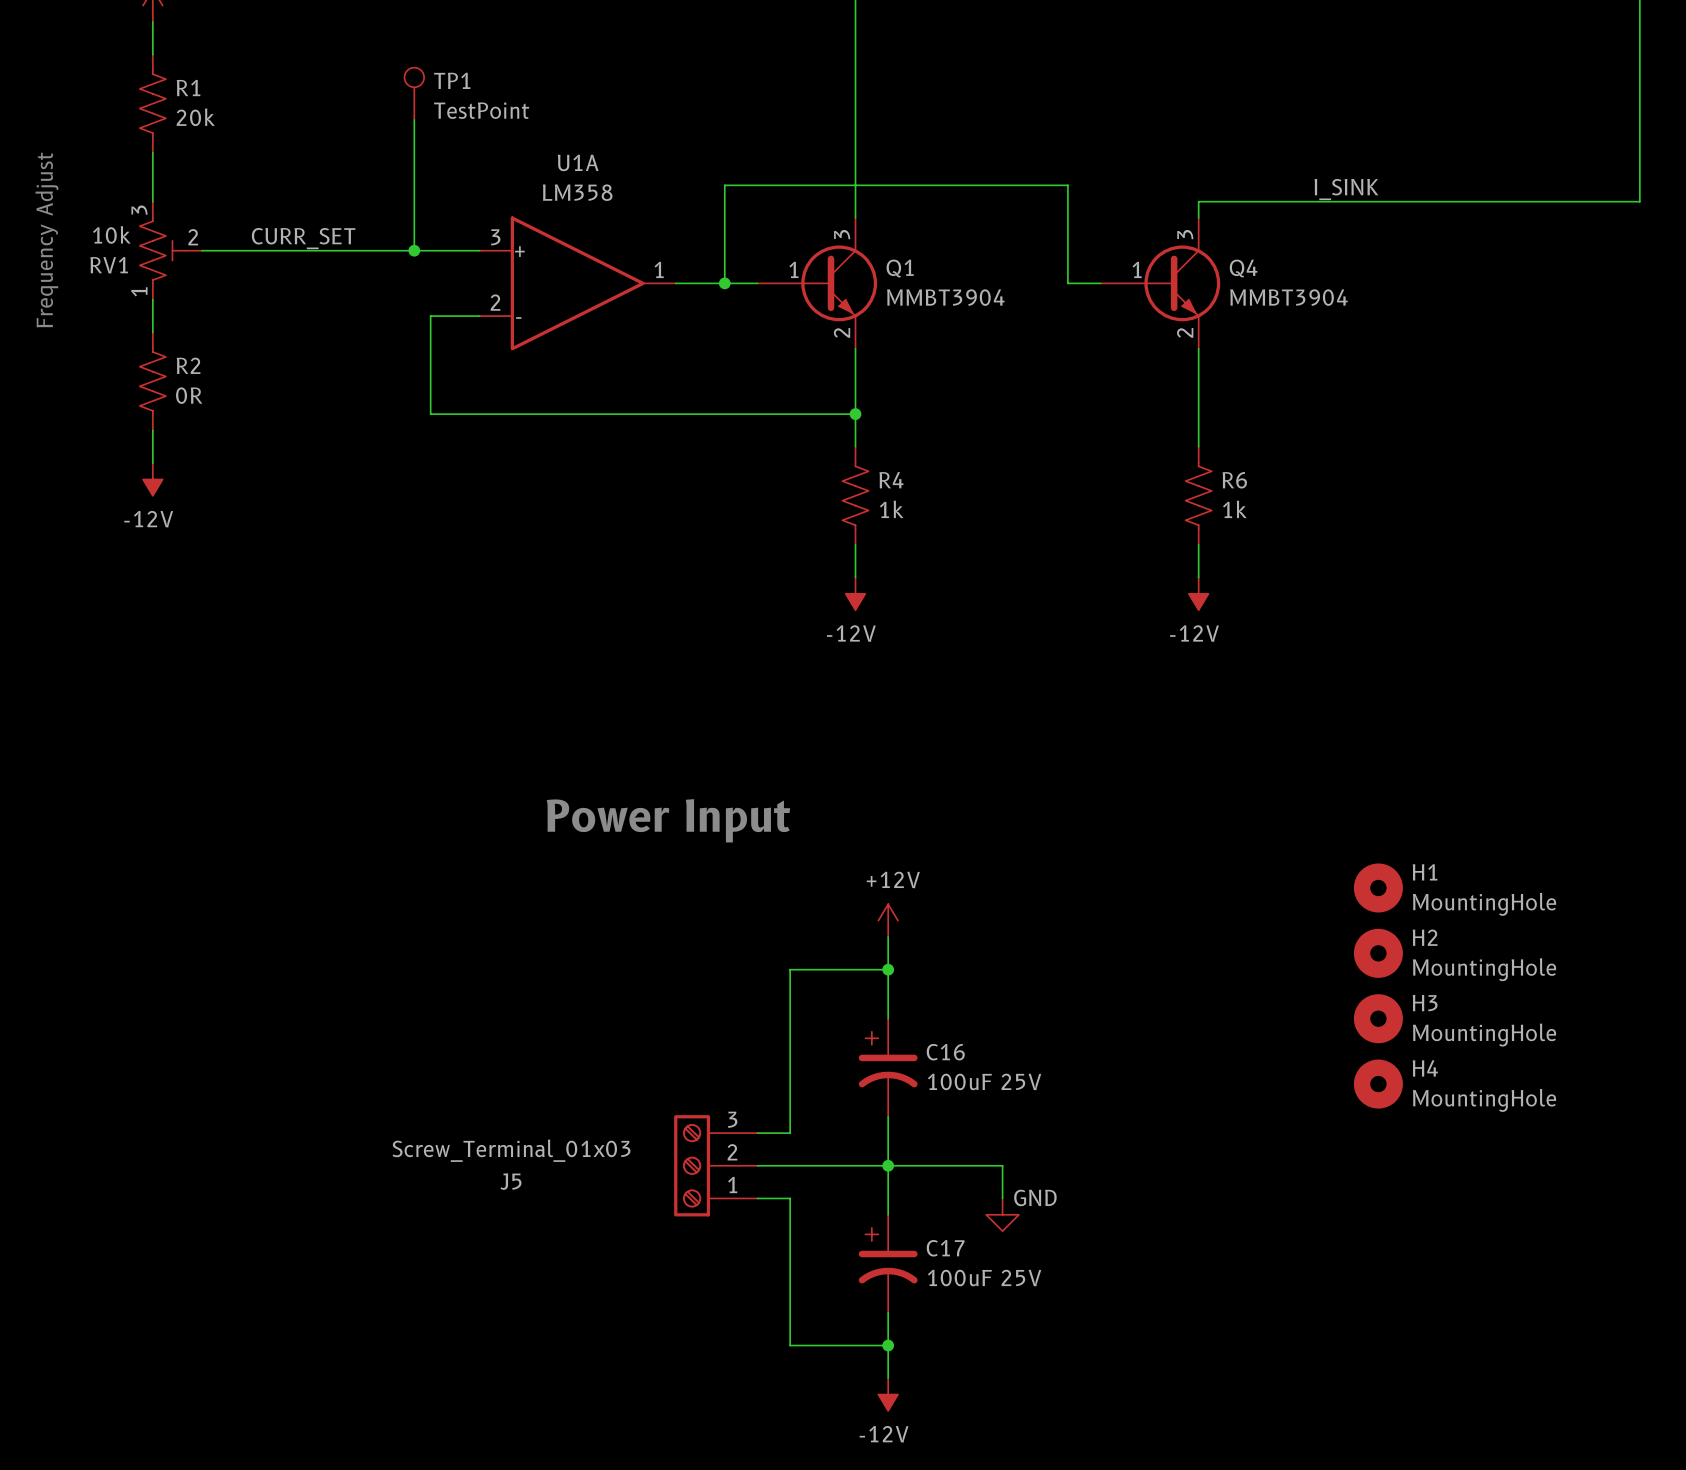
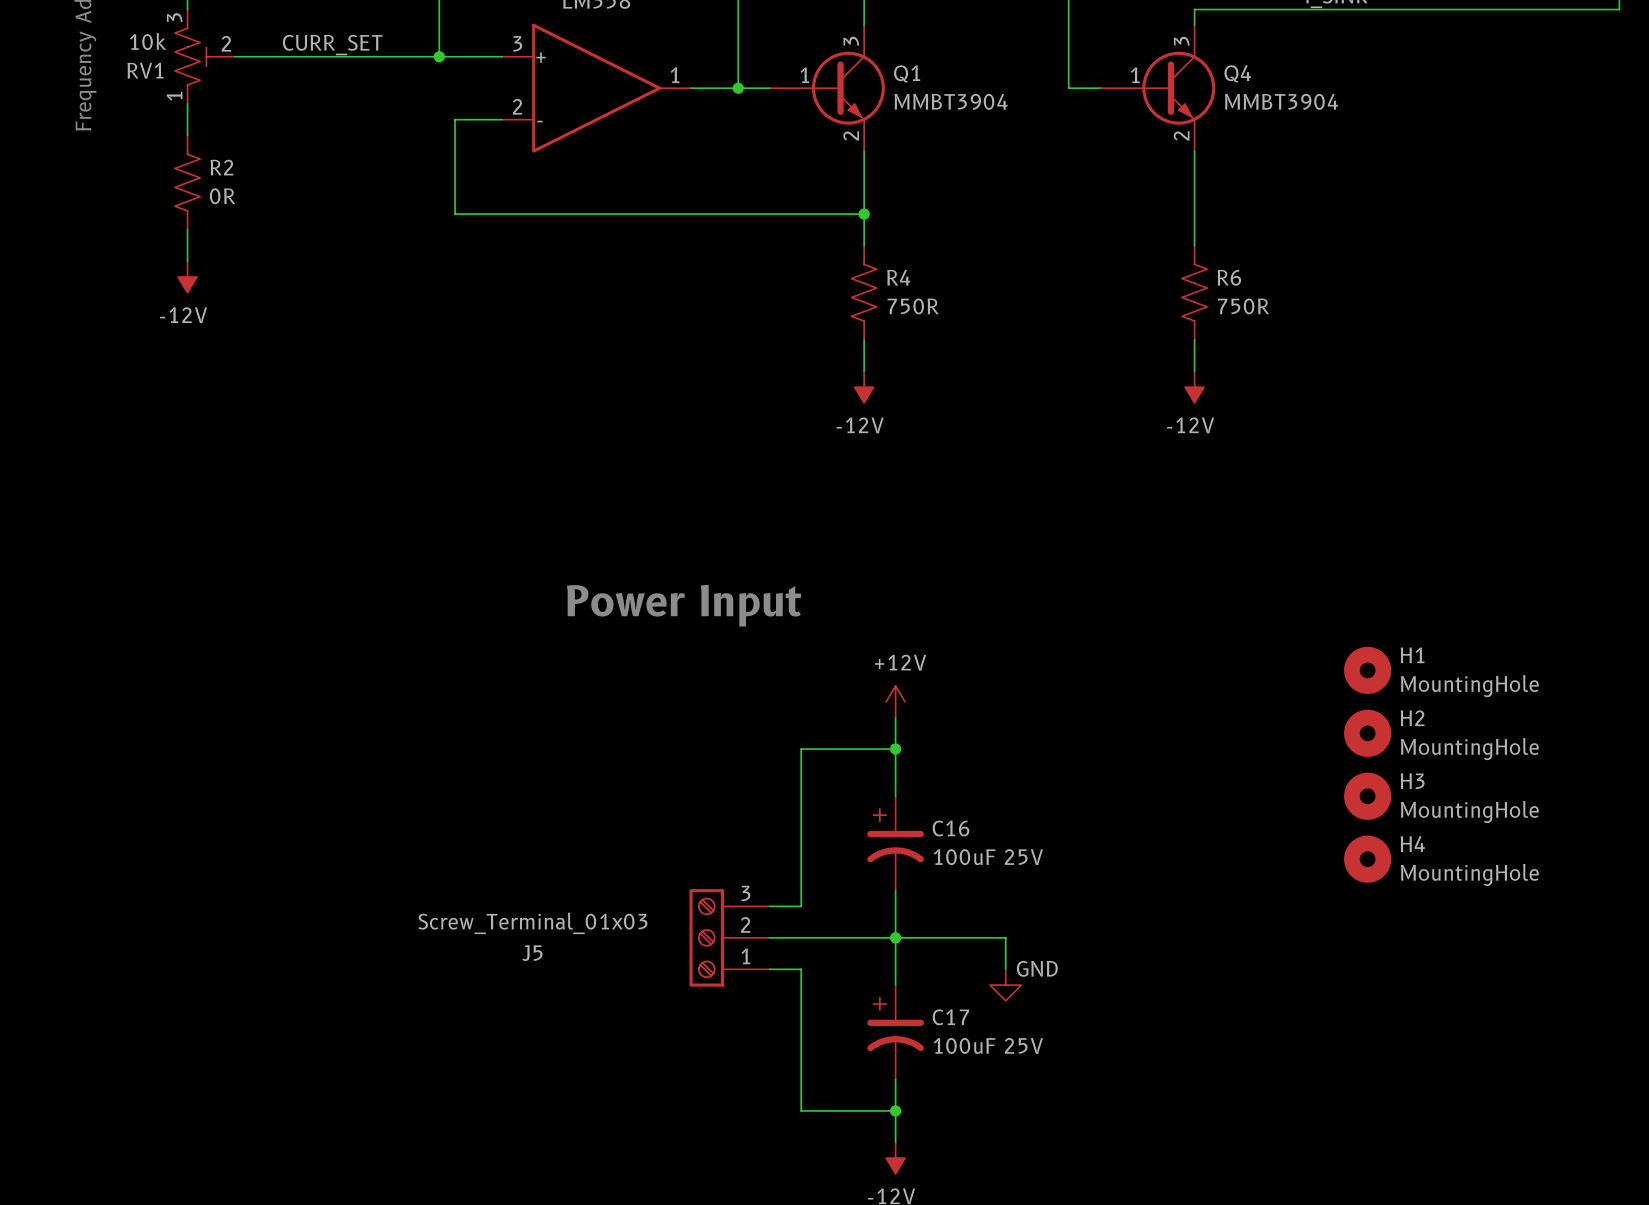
R4 value: 1k (891, 509) -> 750R (913, 306)
R6 value: 1k (1234, 509) -> 750R (1243, 306)

